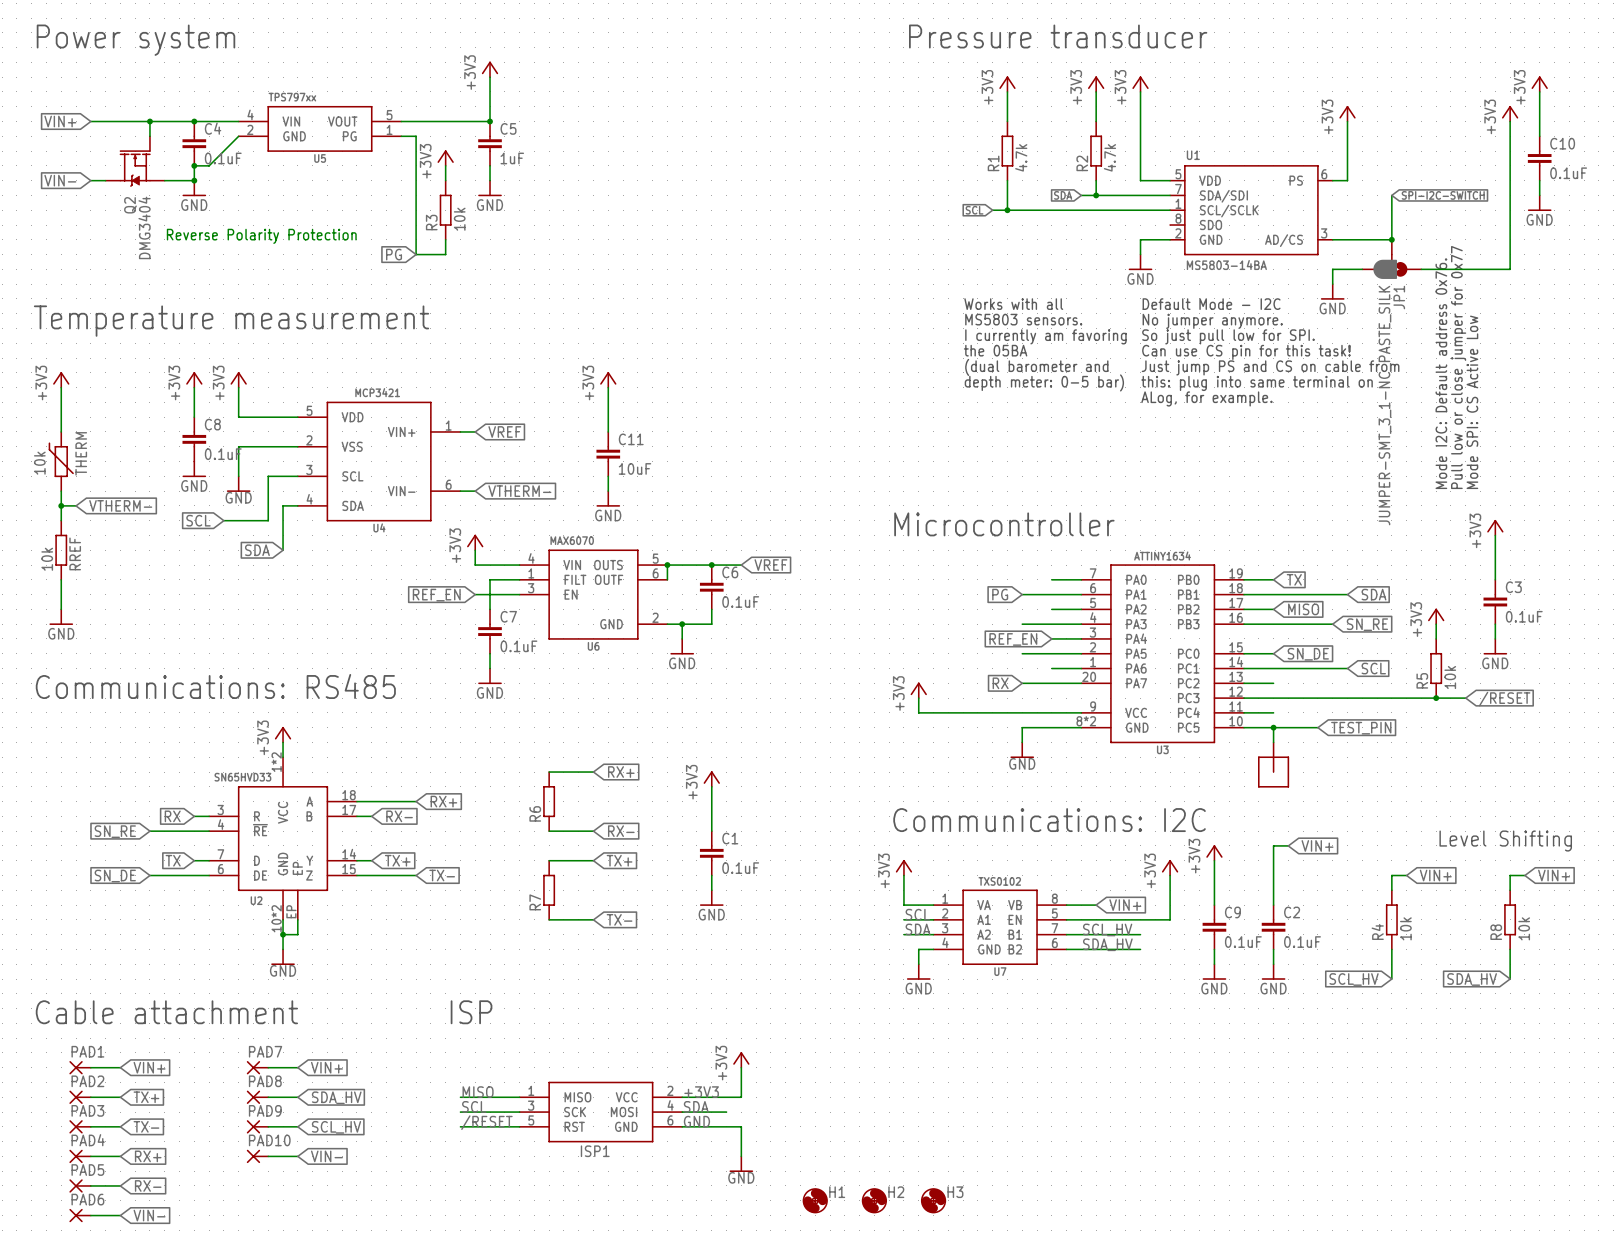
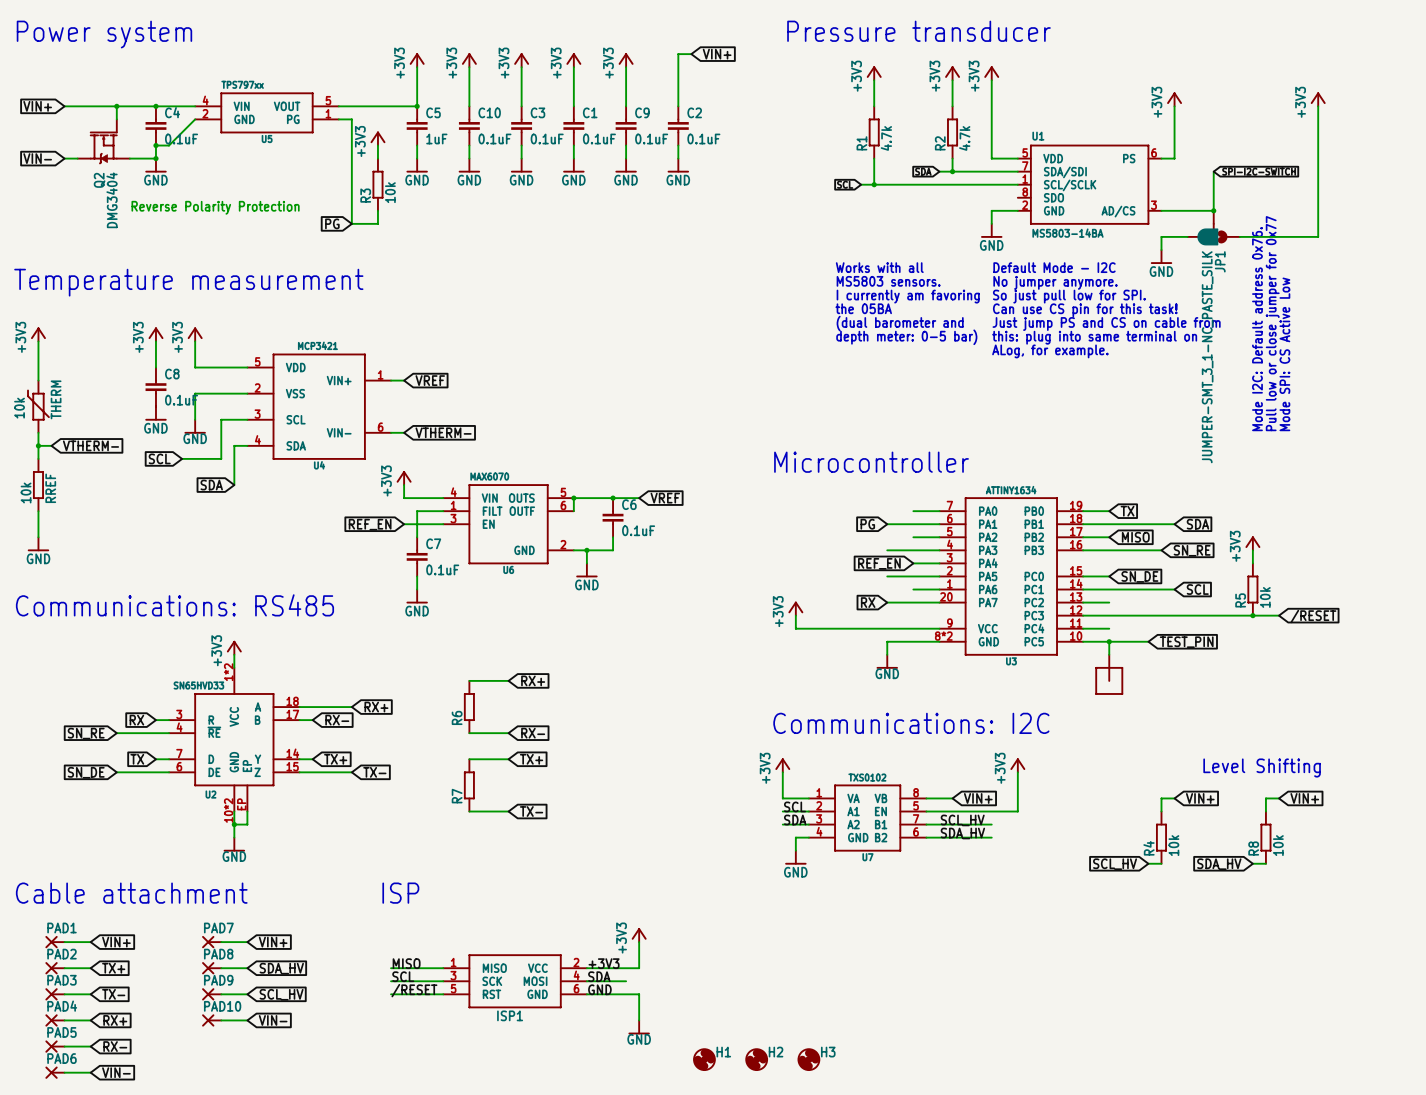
wire: none -> (691, 54) (678, 54) (678, 106)
global label: none -> VIN+ (717, 54)
power symbol: none -> +3V3 (469, 60)
power symbol: none -> +3V3 (521, 60)
power symbol: none -> +3V3 (573, 60)
power symbol: none -> +3V3 (626, 60)
wire: none -> (469, 67) (469, 106)
wire: none -> (521, 67) (521, 106)
wire: none -> (573, 67) (573, 106)
wire: none -> (626, 67) (626, 106)
power symbol: +3V3 (1539, 84) -> none
wire: (1539, 91) (1539, 136) -> none
C10 position: (1539, 158) -> (469, 125)
wire: none -> (469, 145) (469, 158)
wire: none -> (521, 145) (521, 158)
wire: none -> (573, 145) (573, 158)
wire: none -> (626, 145) (626, 158)
wire: none -> (678, 145) (678, 158)
wire: (1539, 180) (1539, 195) -> none
power symbol: none -> GND (469, 165)
power symbol: none -> GND (521, 165)
power symbol: none -> GND (573, 165)
power symbol: none -> GND (626, 165)
power symbol: none -> GND (678, 165)
power symbol: GND (1539, 203) -> none
power symbol: +3V3 (608, 379) -> none
wire: (608, 387) (608, 431) -> none
C11: 10uF (608, 454) -> none
wire: (608, 476) (608, 491) -> none
power symbol: GND (608, 498) -> none
power symbol: +3V3 (1495, 527) -> none
wire: (1495, 535) (1495, 579) -> none
C3 position: (1495, 602) -> (521, 125)
wire: (1495, 624) (1495, 638) -> none
power symbol: GND (1495, 646) -> none
power symbol: +3V3 (711, 779) -> none
wire: (711, 786) (711, 831) -> none
text position: Level Shifting (1505, 841) -> Level Shifting (1262, 767)
wire: (1288, 845) (1273, 845) (1273, 905) -> none
global label: VIN+ (1317, 845) -> none
power symbol: +3V3 (1214, 852) -> none
C1 position: (711, 853) -> (573, 125)
wire: (1214, 860) (1214, 905) -> none
wire: (711, 875) (711, 890) -> none
wire: (1406, 875) (1391, 875) (1391, 890) -> (1174, 798) (1161, 798) (1161, 811)
global label: VIN+ (1435, 875) -> none
wire: (1524, 875) (1510, 875) (1510, 890) -> (1279, 798) (1265, 798) (1265, 811)
global label: VIN+ (1554, 875) -> none
power symbol: GND (711, 898) -> none
global label: none -> VIN+ (1200, 798)
global label: none -> VIN+ (1304, 798)
R4 position: (1391, 919) -> (1161, 837)
R8 position: (1510, 919) -> (1265, 837)
C9 position: (1214, 927) -> (626, 125)
C2 position: (1273, 927) -> (678, 125)
wire: (1214, 949) (1214, 964) -> none
wire: (1273, 949) (1273, 964) -> none
wire: (1391, 949) (1391, 979) -> none
wire: (1510, 949) (1510, 979) -> none
power symbol: GND (1214, 971) -> none
power symbol: GND (1273, 971) -> none
wire: none -> (1148, 863) (1161, 863)
global label position: SCL_HV (1354, 979) -> SCL_HV (1115, 864)
wire: none -> (1252, 863) (1265, 863)
global label position: SDA_HV (1472, 979) -> SDA_HV (1219, 864)

